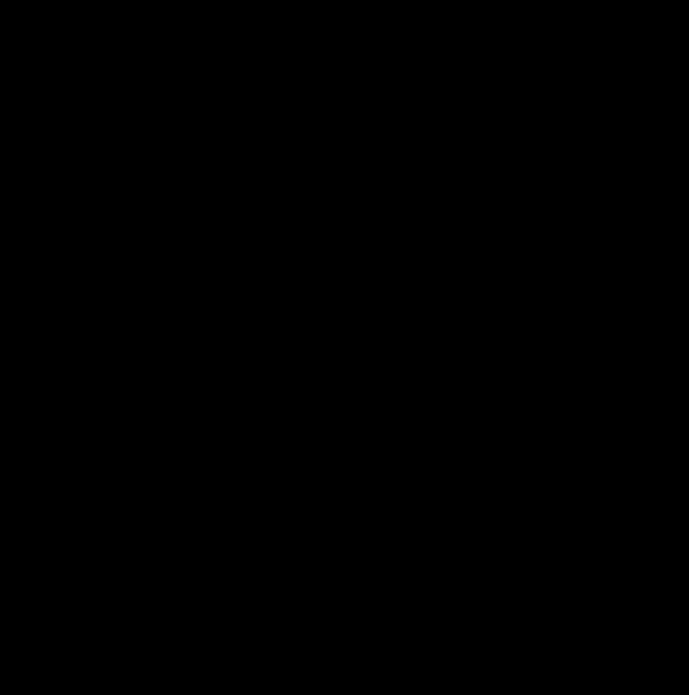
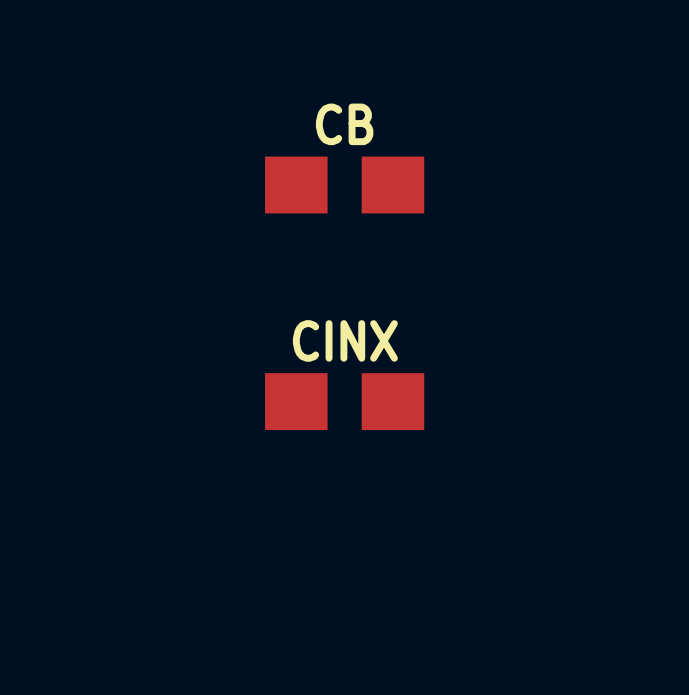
CB: none -> (344, 185)
CINX: none -> (344, 401)

